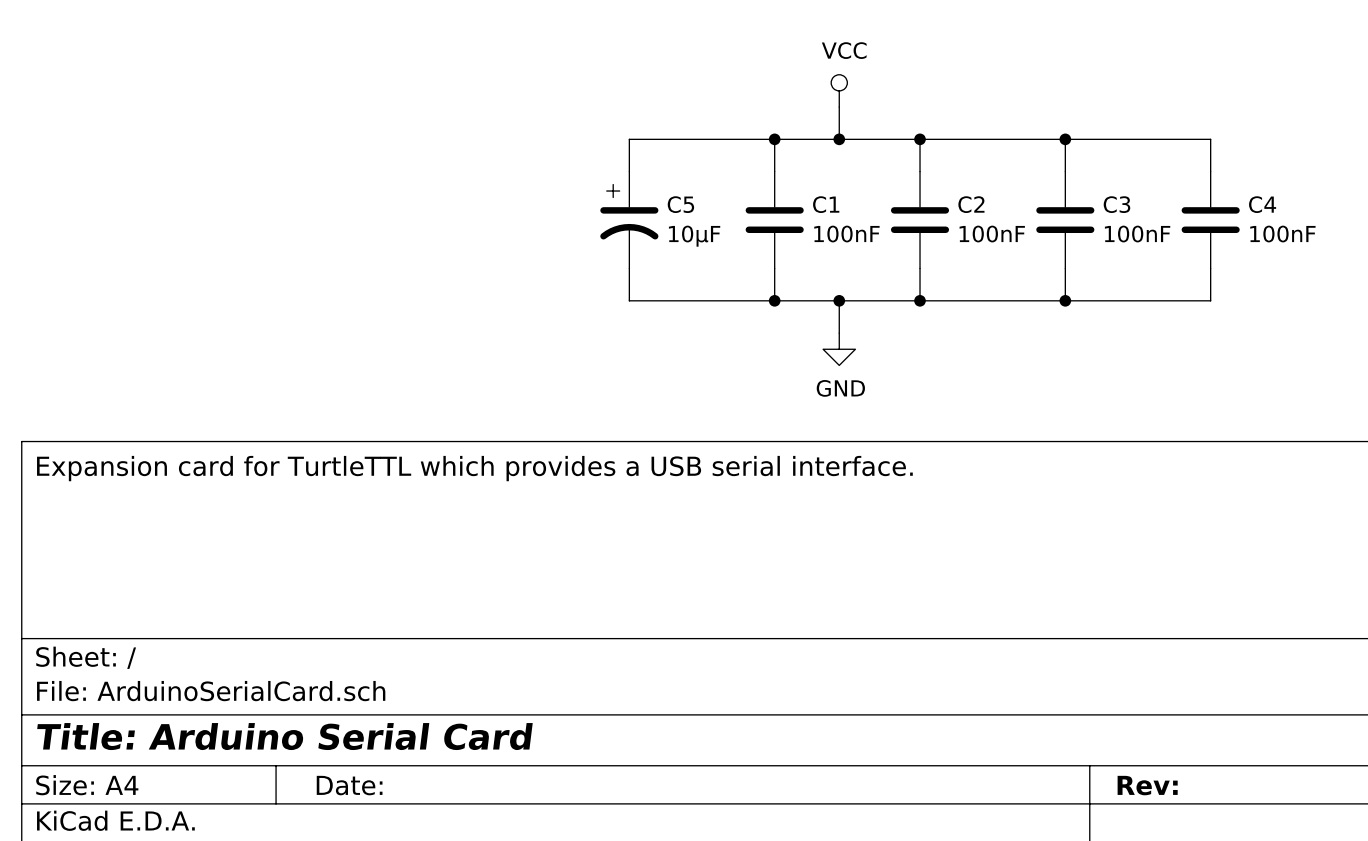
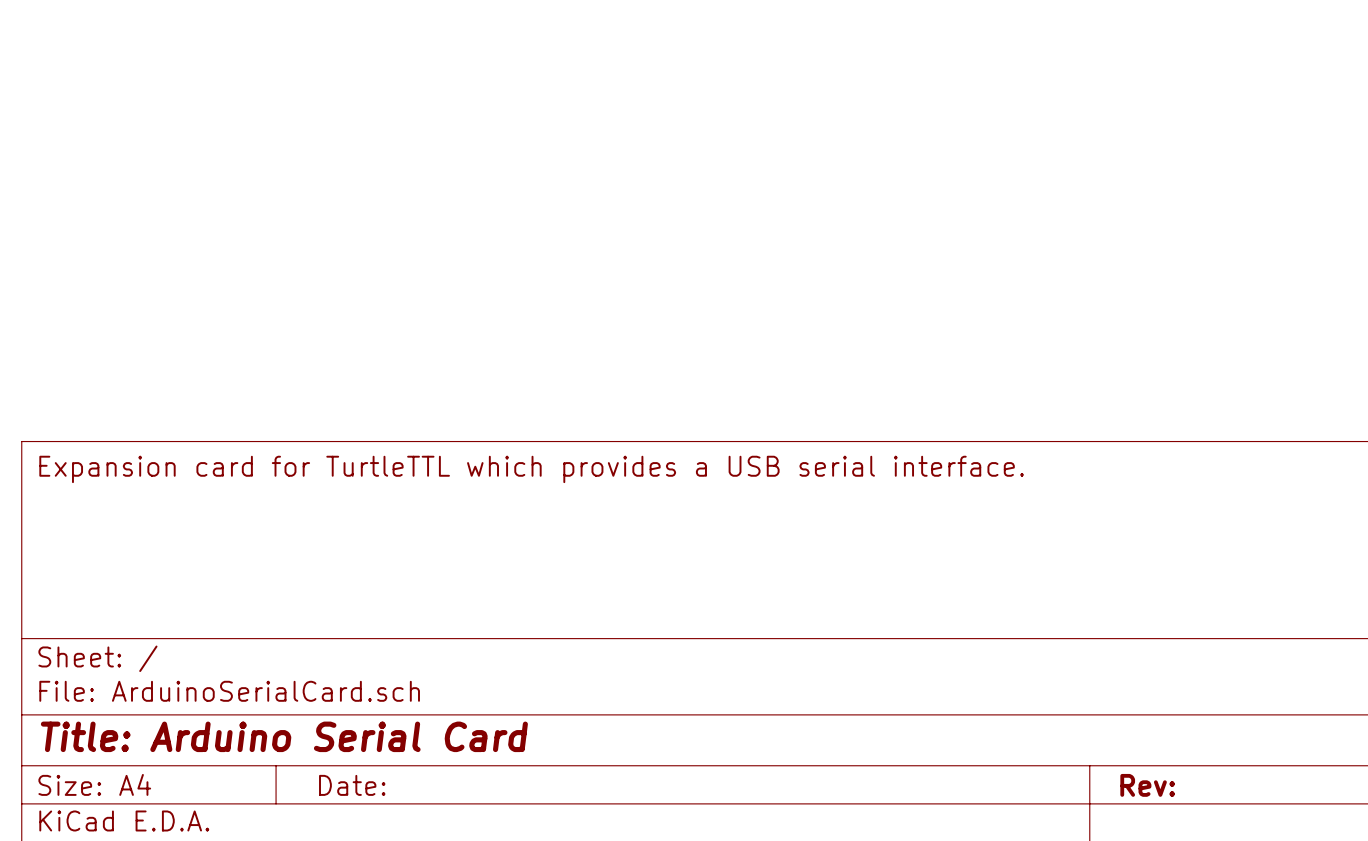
power symbol: VCC (839, 90) -> none
wire: (839, 107) (839, 139) -> none
wire: (774, 139) (774, 171) -> none
junction: (774, 139) -> none
junction: (839, 139) -> none
wire: (920, 139) (920, 171) -> none
junction: (920, 139) -> none
wire: (1065, 139) (1065, 171) -> none
junction: (1065, 139) -> none
wire: (629, 171) (629, 139) (1210, 139) (1210, 171) -> none
C5: 10µF (629, 220) -> none
C1: 100nF (774, 220) -> none
C2: 100nF (920, 220) -> none
C3: 100nF (1065, 220) -> none
C4: 100nF (1210, 220) -> none
wire: (629, 268) (629, 300) (1210, 300) (1210, 268) -> none
wire: (774, 268) (774, 300) -> none
wire: (920, 268) (920, 300) -> none
wire: (1065, 268) (1065, 300) -> none
junction: (774, 300) -> none
wire: (839, 300) (839, 333) -> none
junction: (839, 300) -> none
junction: (920, 300) -> none
junction: (1065, 300) -> none
power symbol: GND (839, 349) -> none

